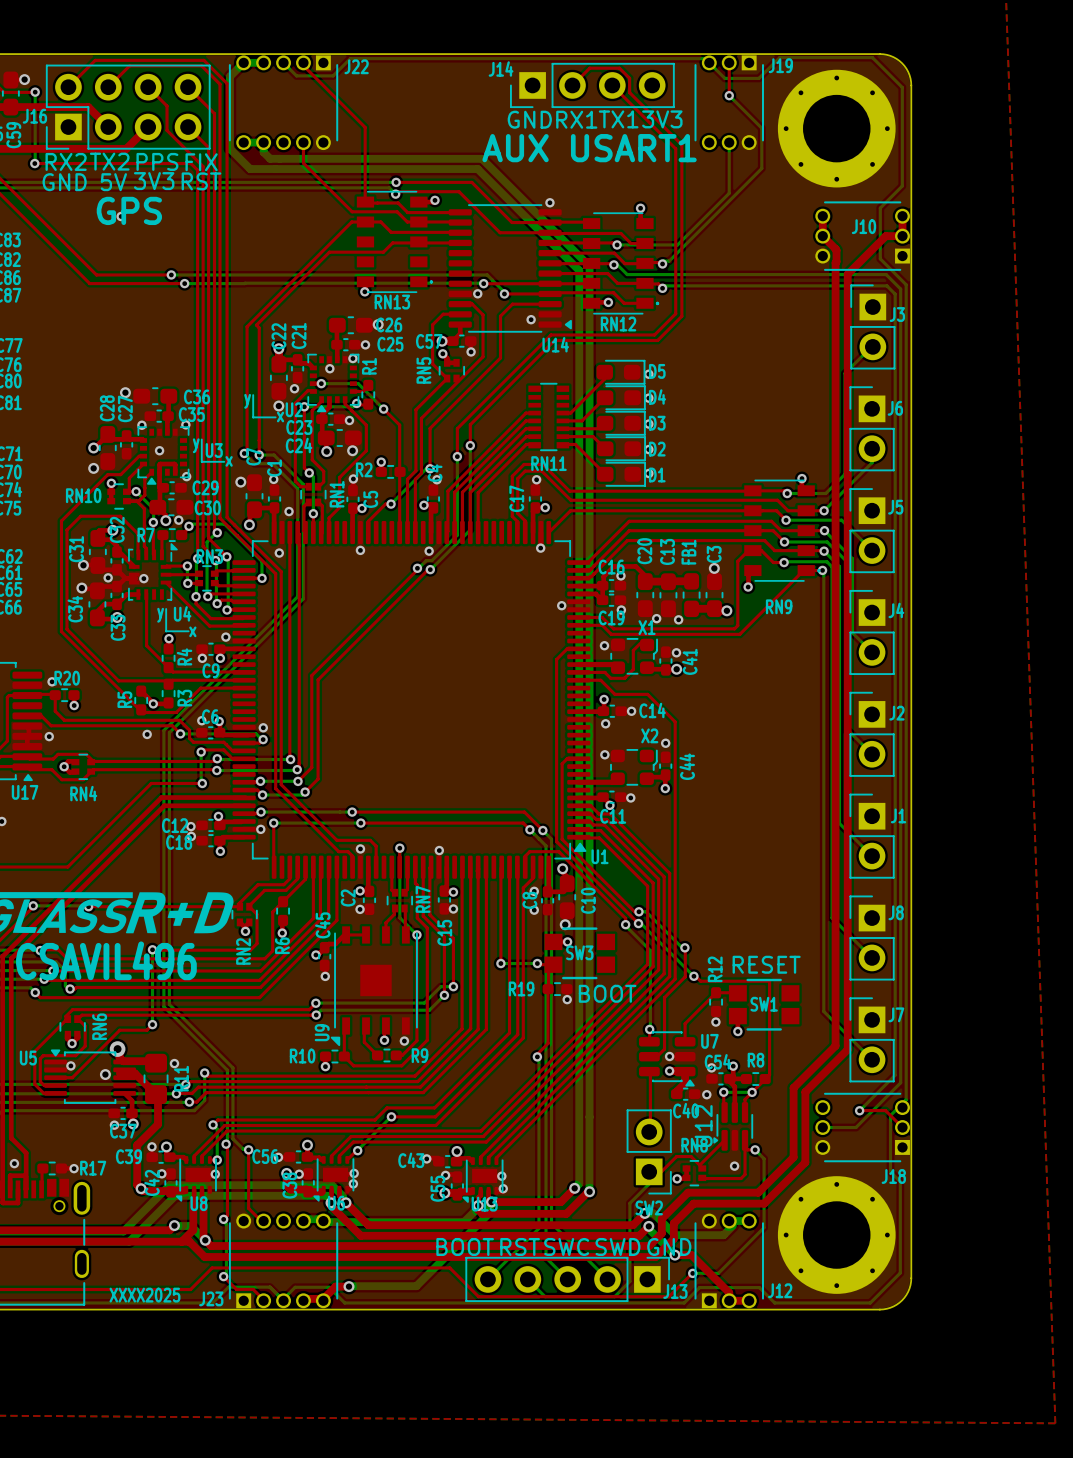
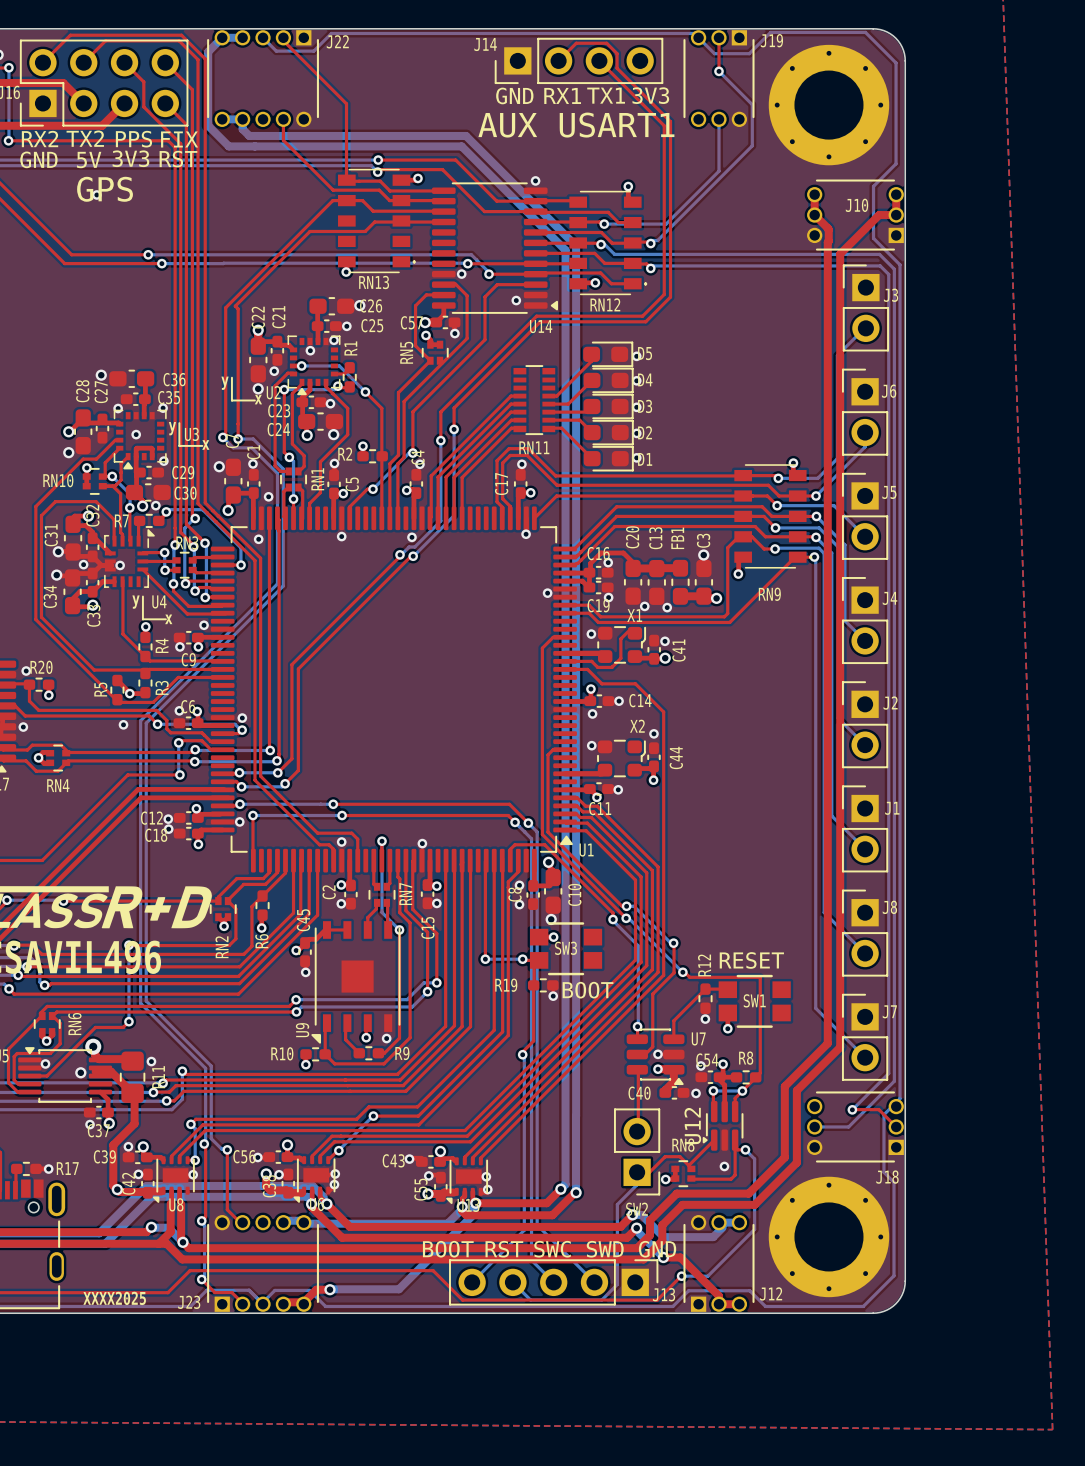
C40 name position: C40 (686, 1110) -> C40 (639, 1093)

